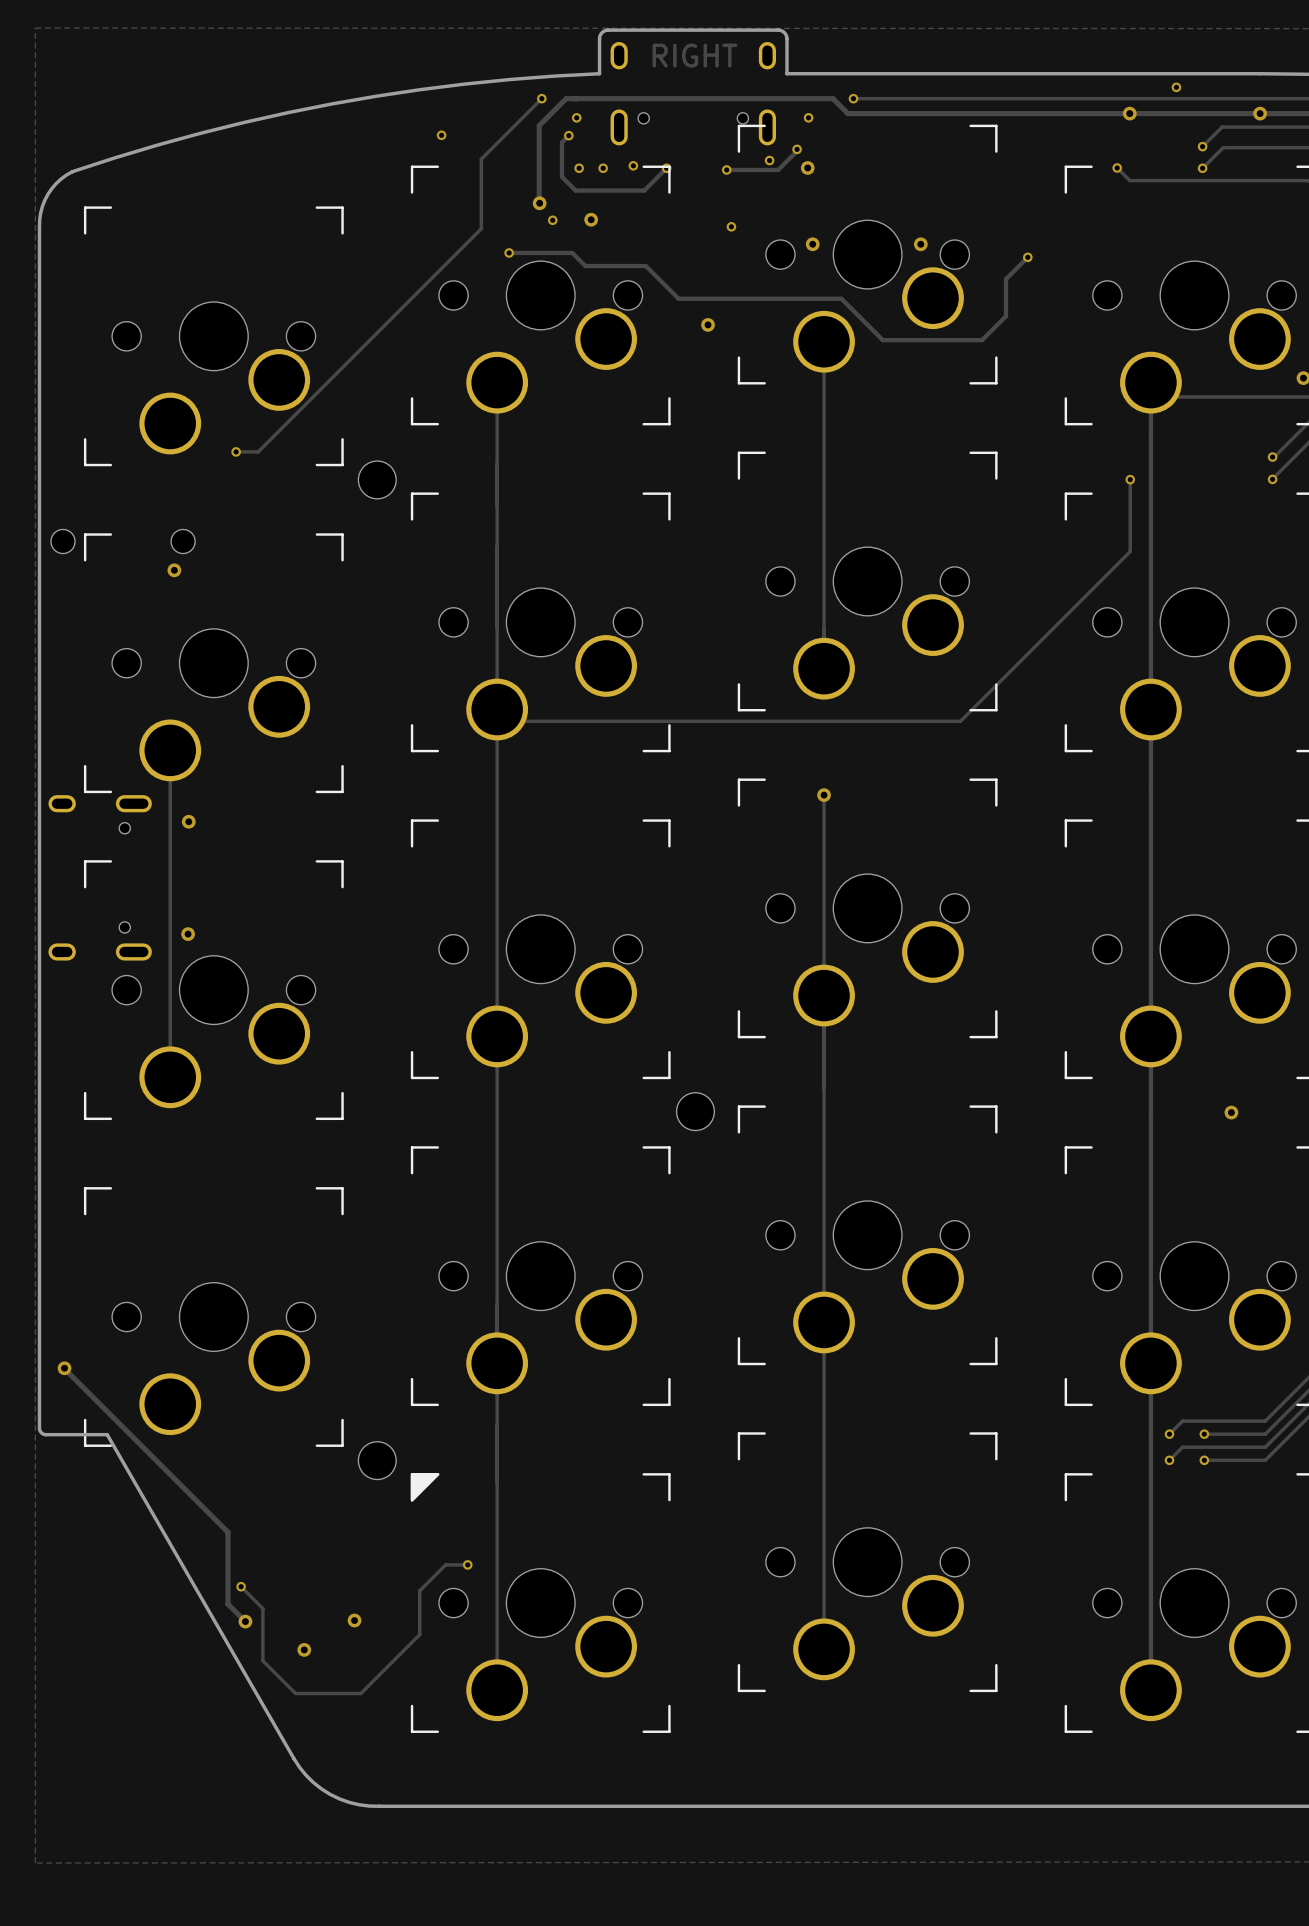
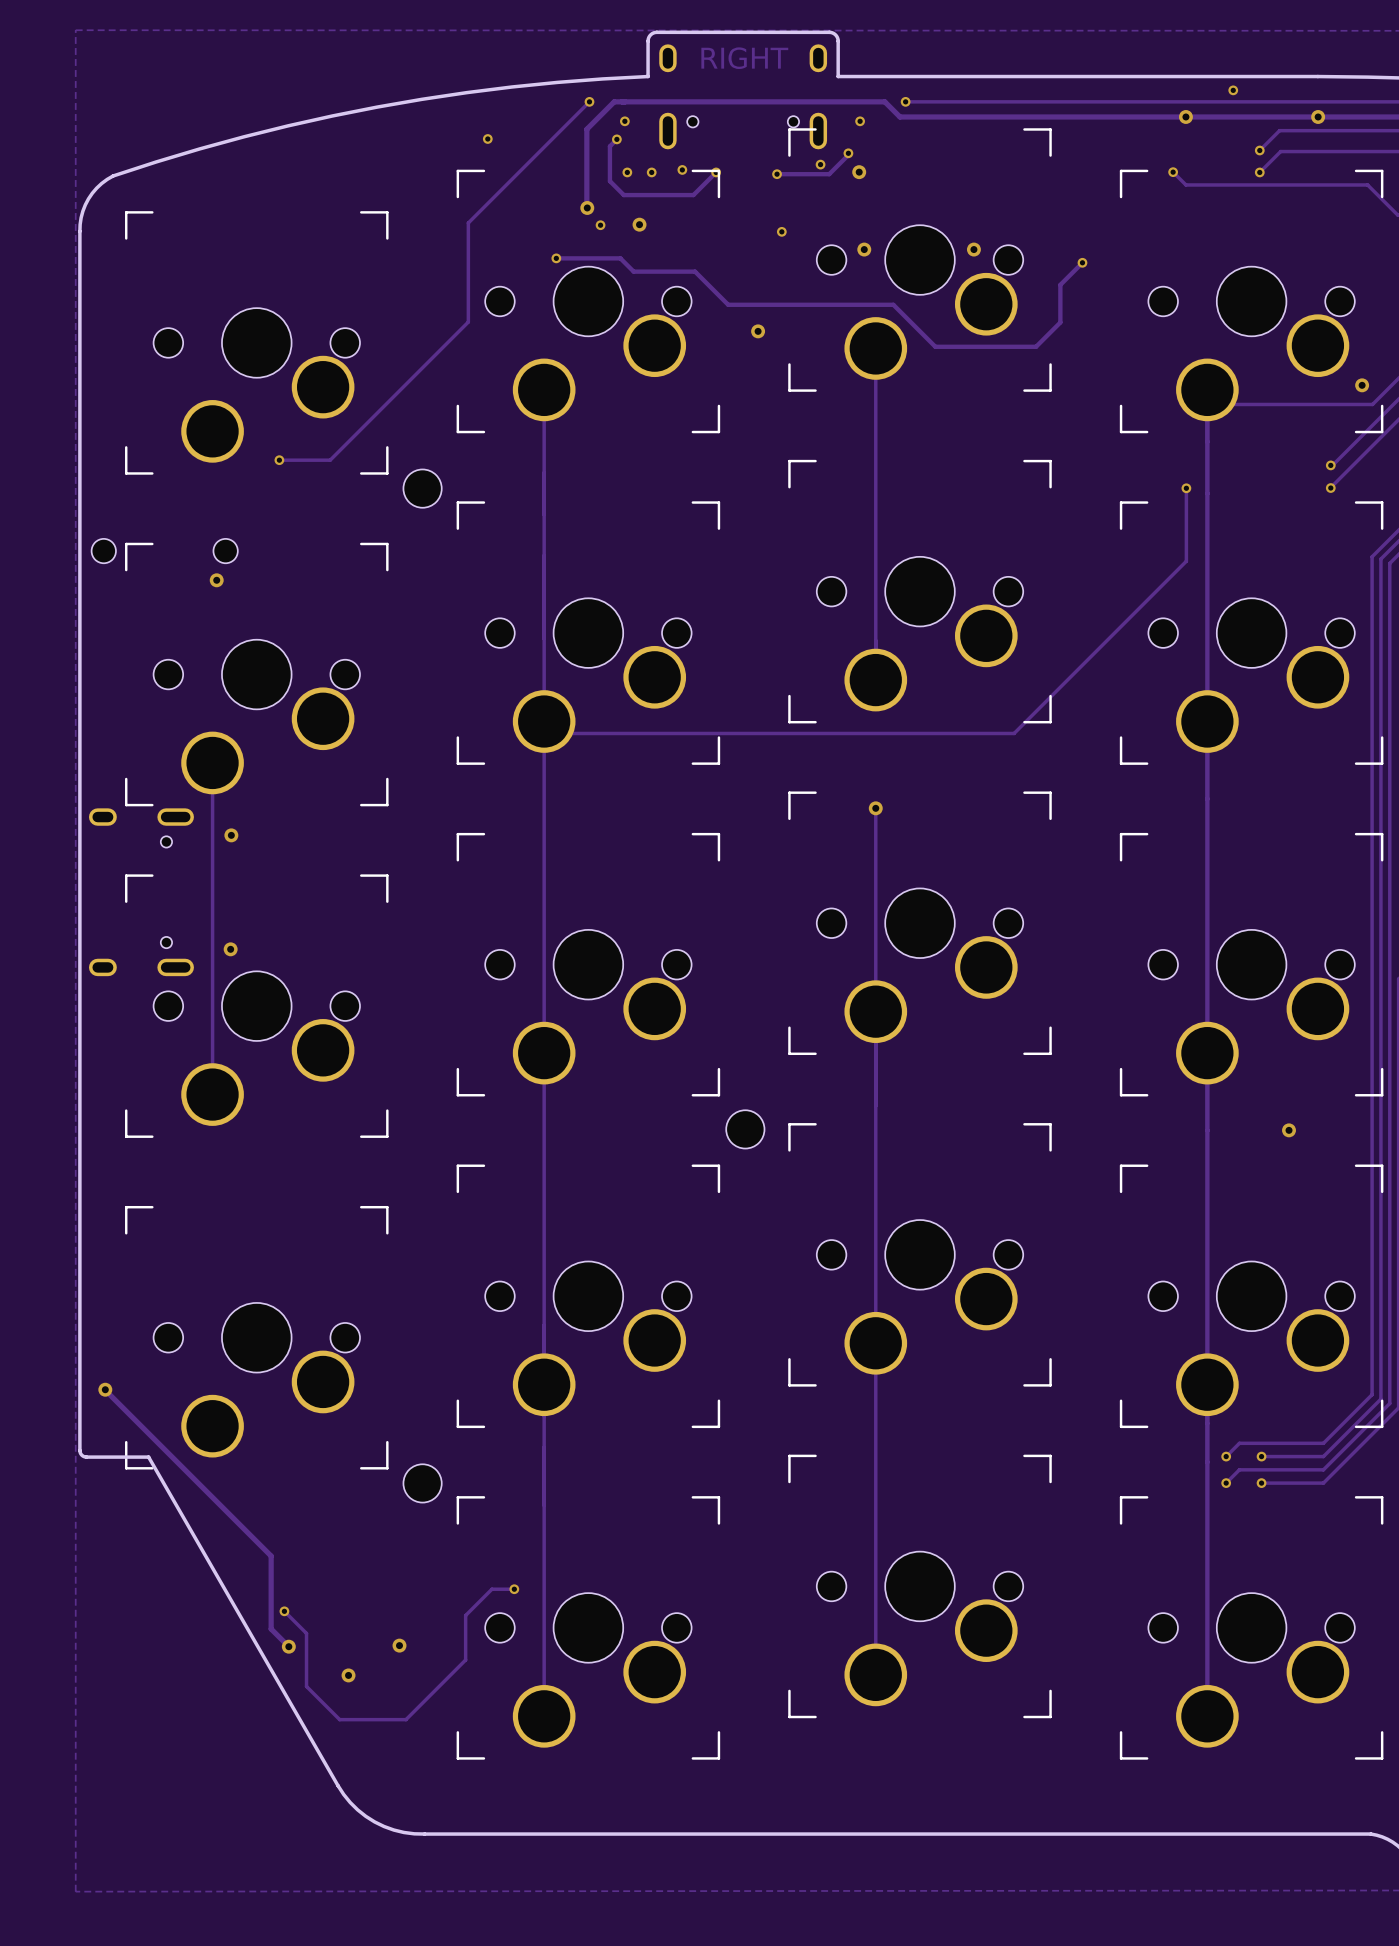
track: (481, 159) (481, 228) (258, 451) -> (528, 163) (468, 223) (468, 322) (330, 460) (301, 460)
drawing: [410, 1473, 440, 1502] -> none

